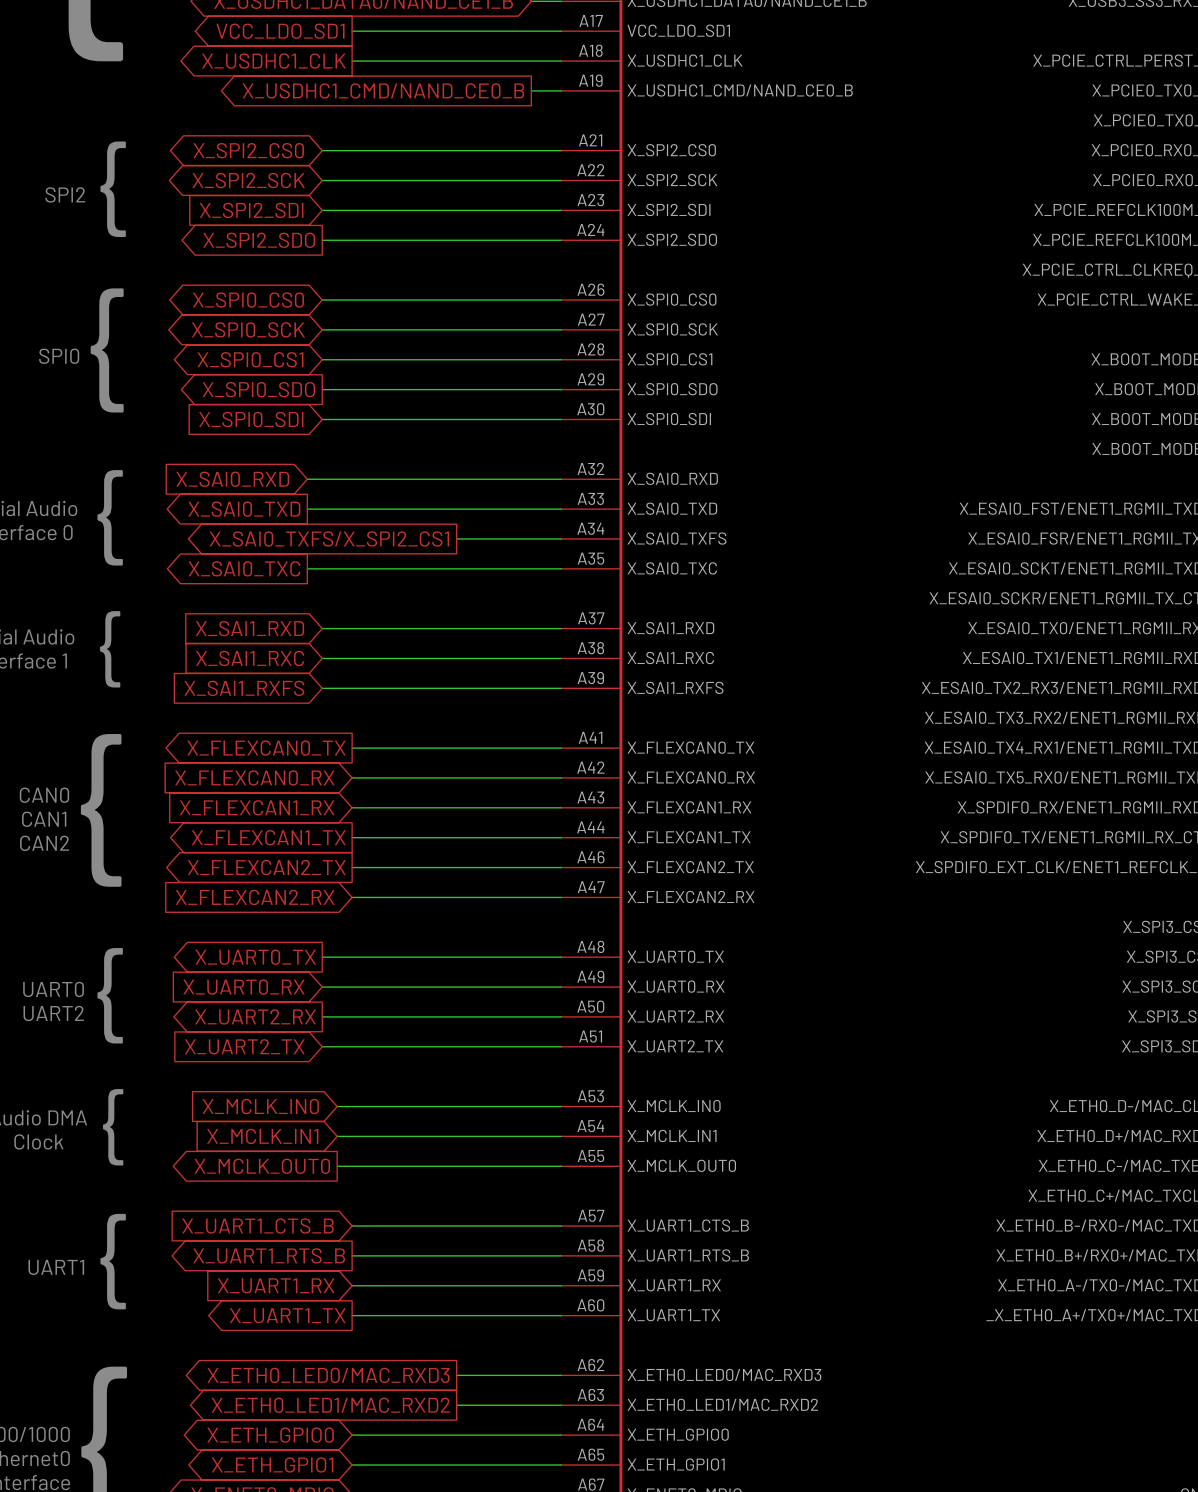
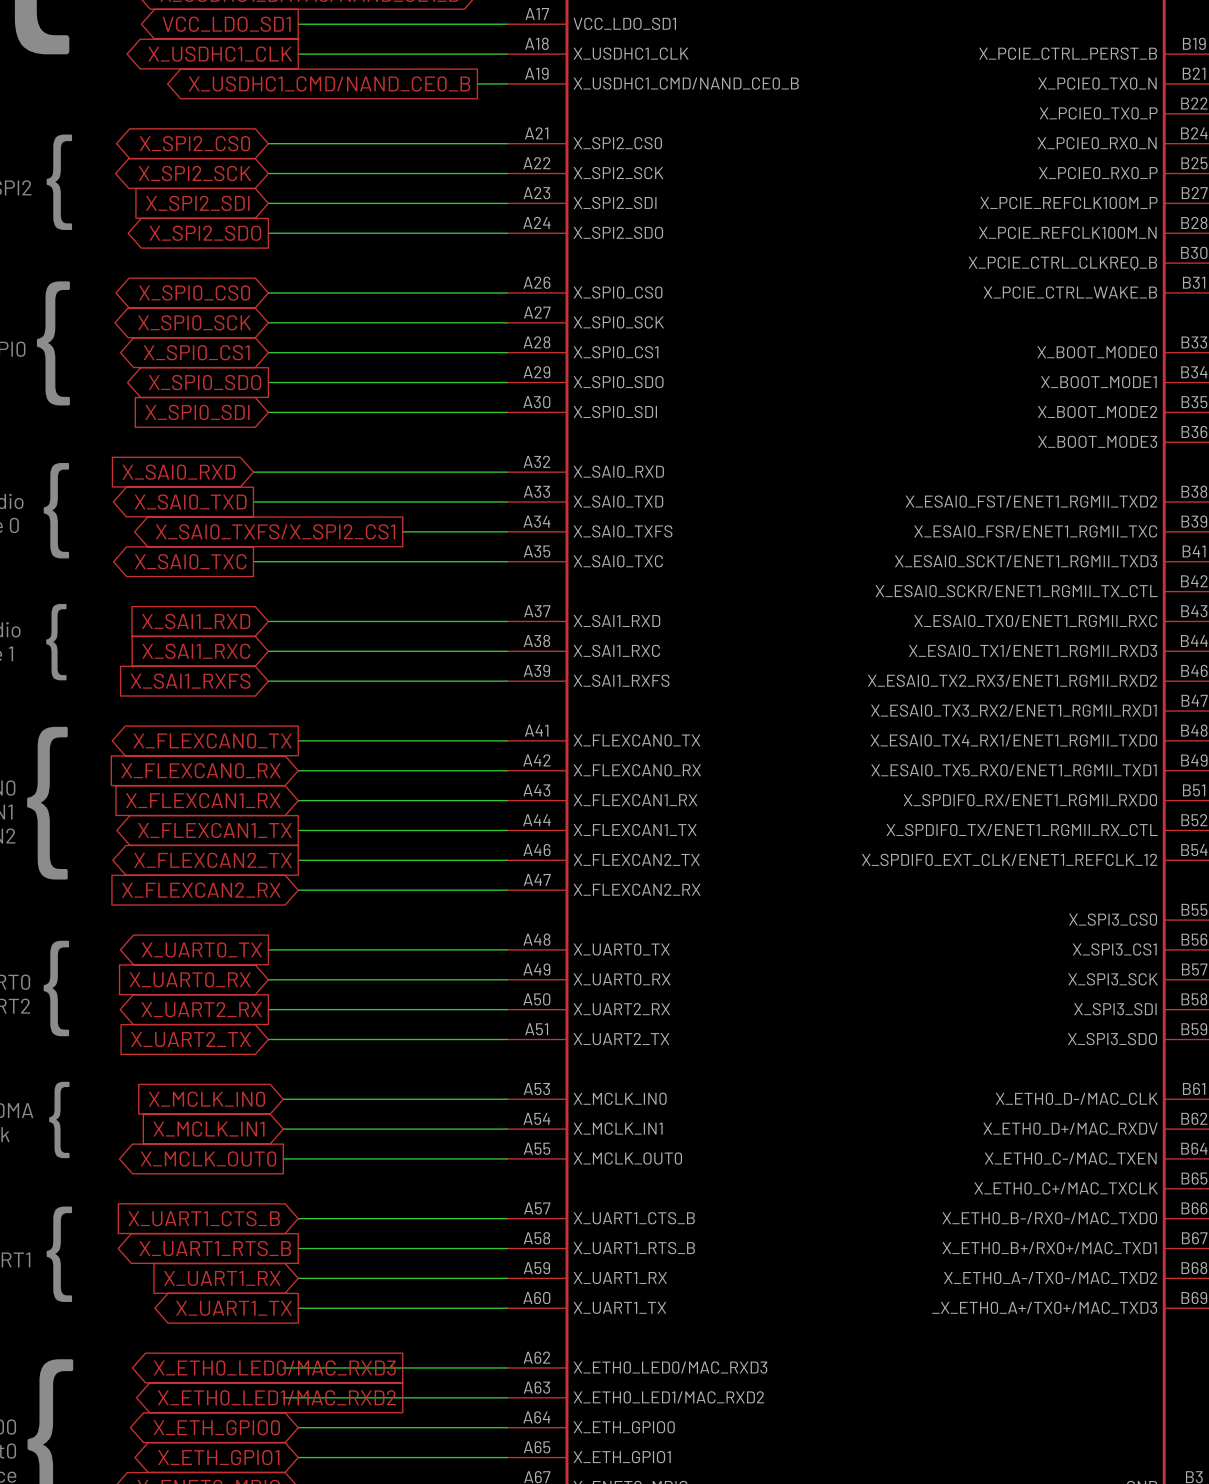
wire: none -> (283, 1367) (402, 1367)
wire: none -> (283, 1397) (402, 1397)

